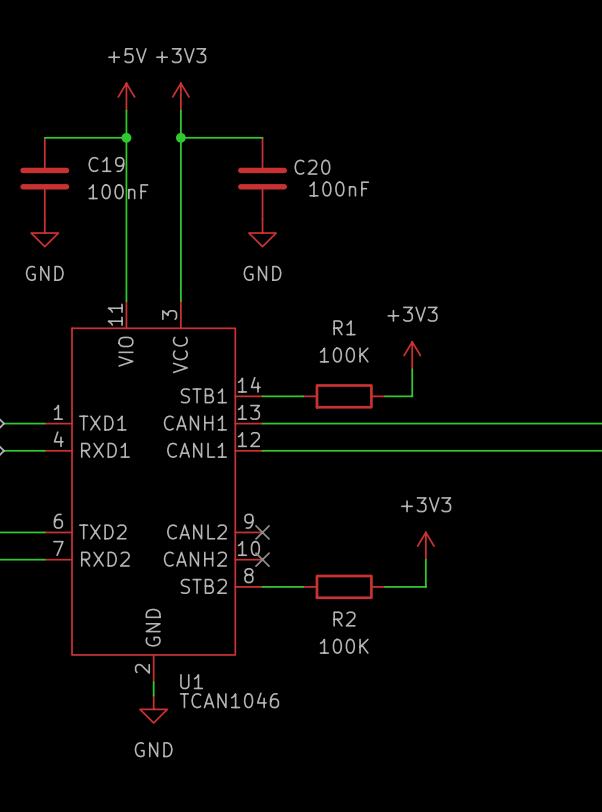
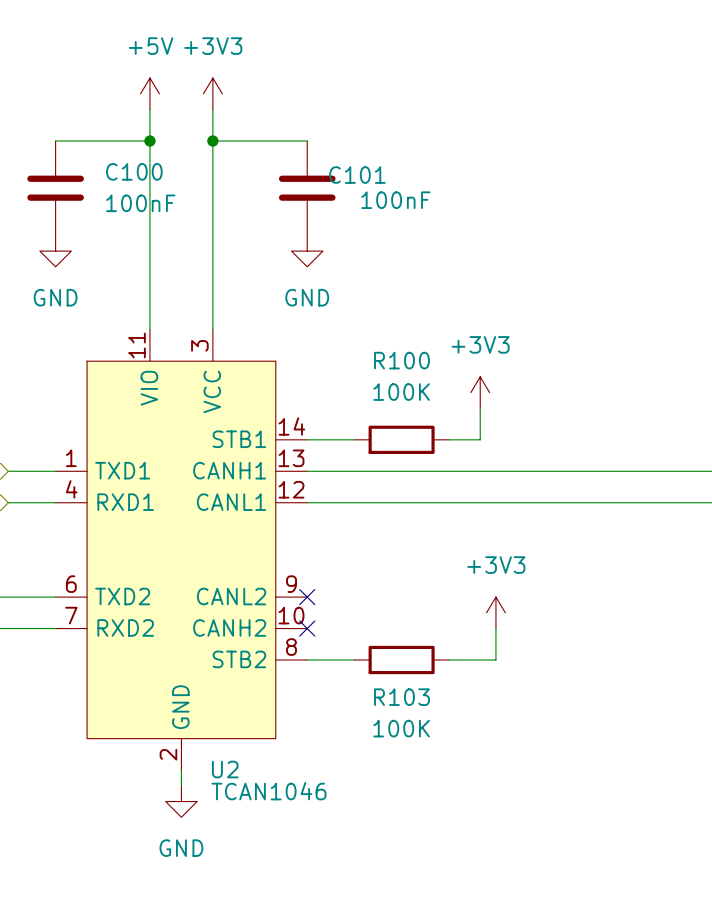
C19 name: C19 (106, 164) -> C100 (134, 171)
C20 name: C20 (312, 167) -> C101 (357, 175)
R1 name: R1 (344, 327) -> R100 (401, 360)
R2 name: R2 (344, 619) -> R103 (401, 697)
U1 name: U1 (191, 681) -> U2 (225, 769)

